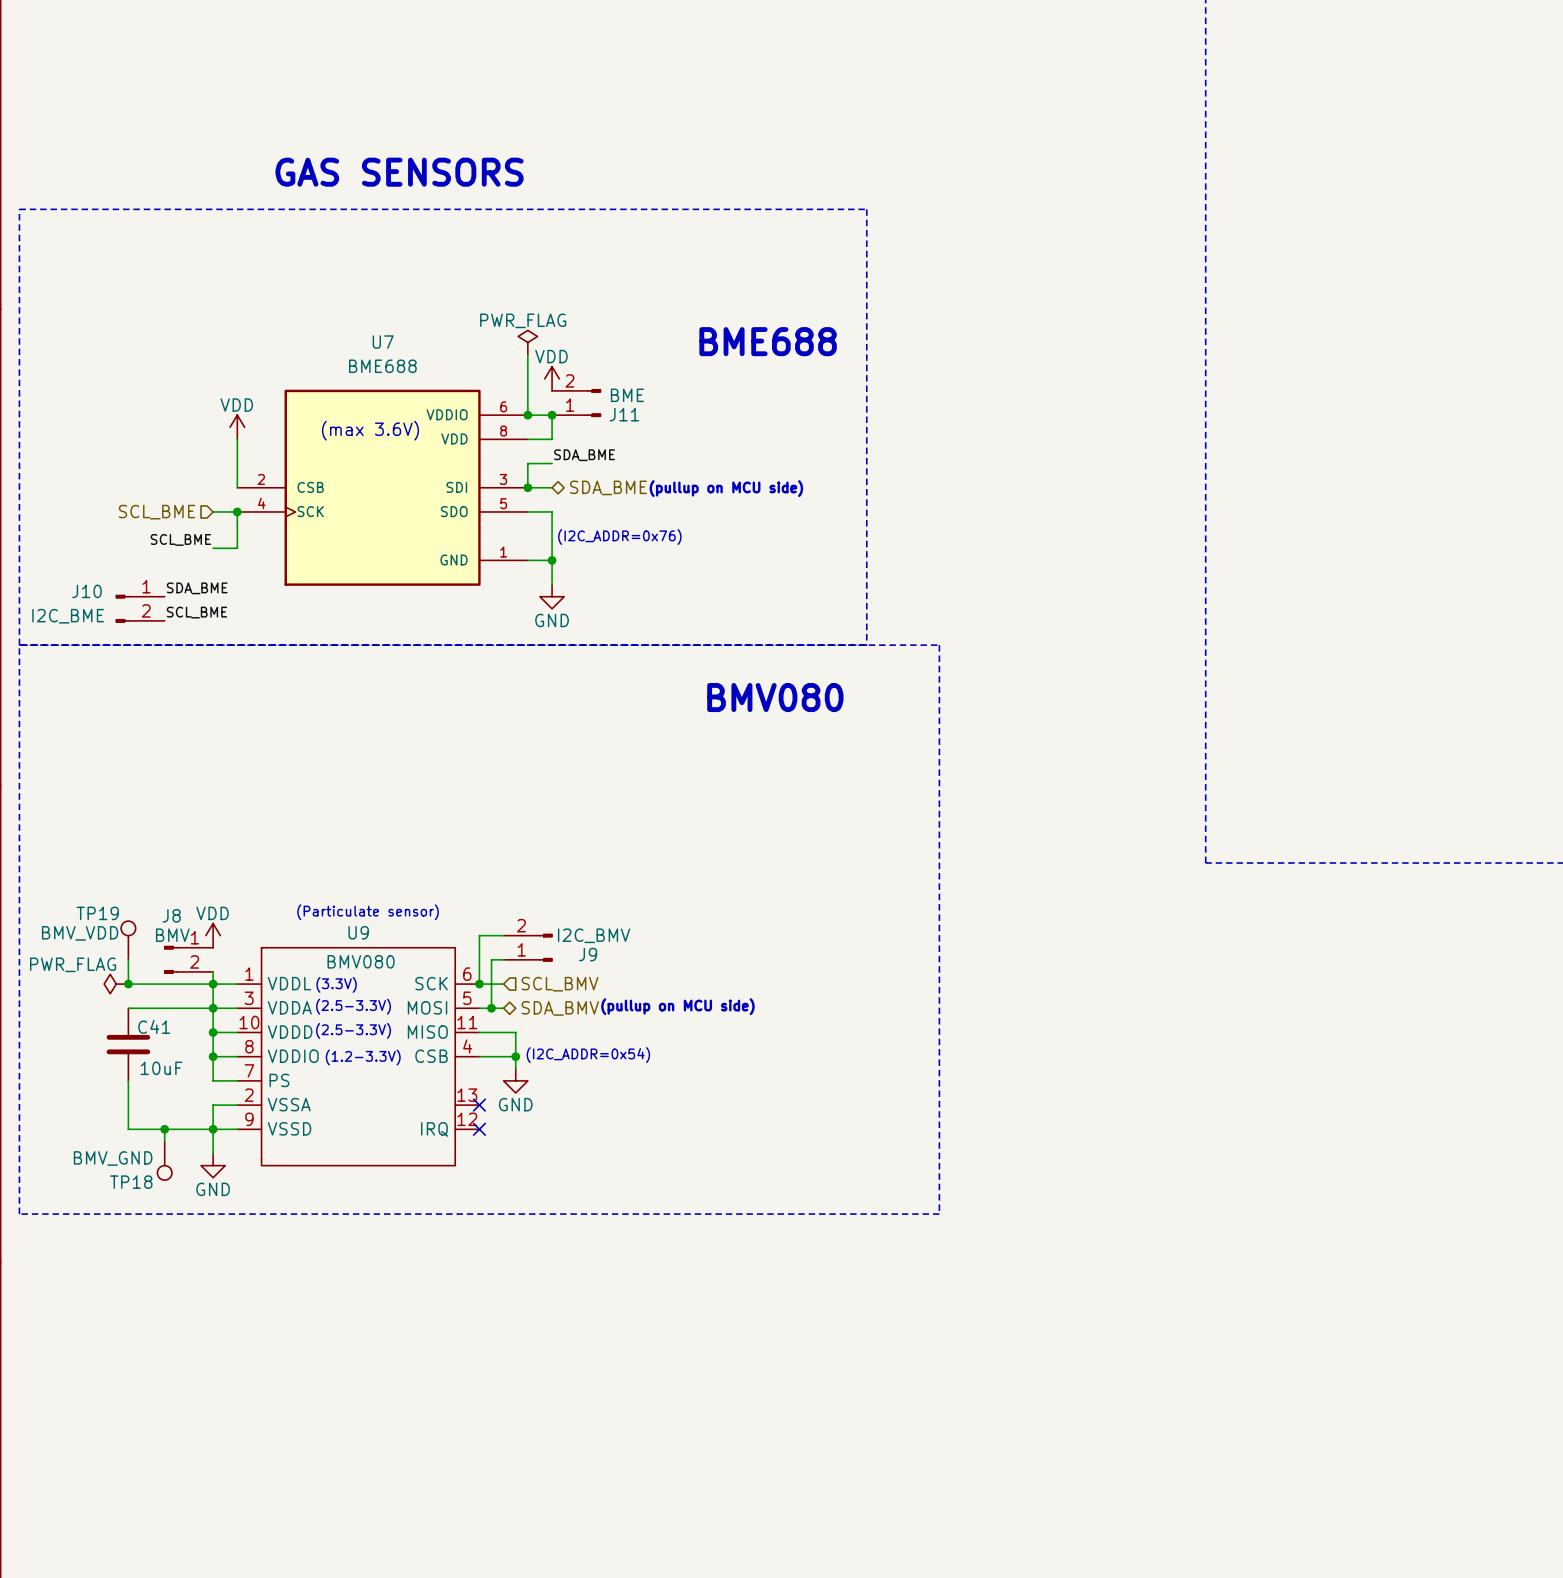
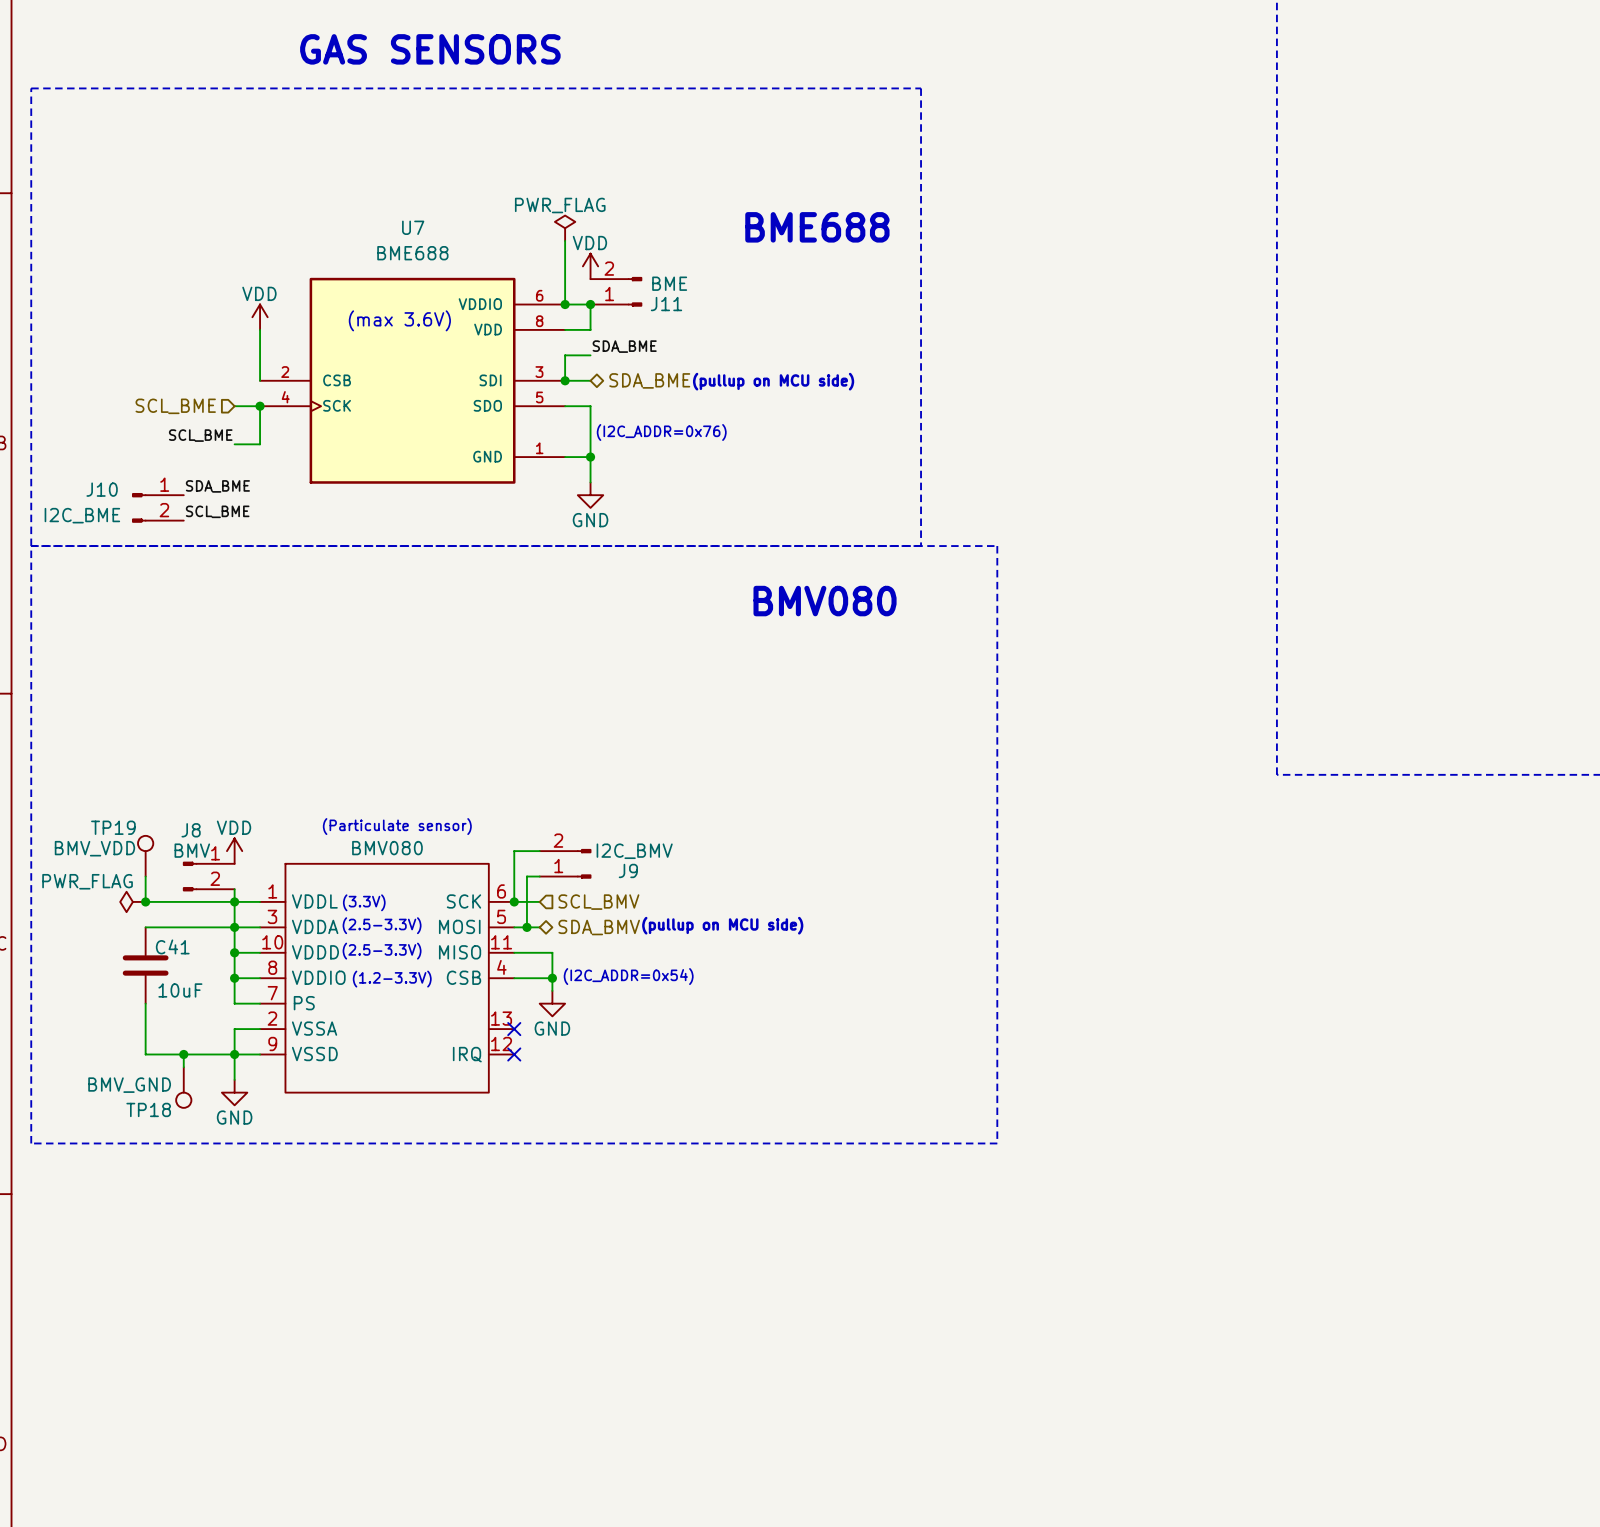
U9 name: U9 (358, 932) -> BMV080 (387, 848)
U9 value: BMV080 (361, 961) -> none

